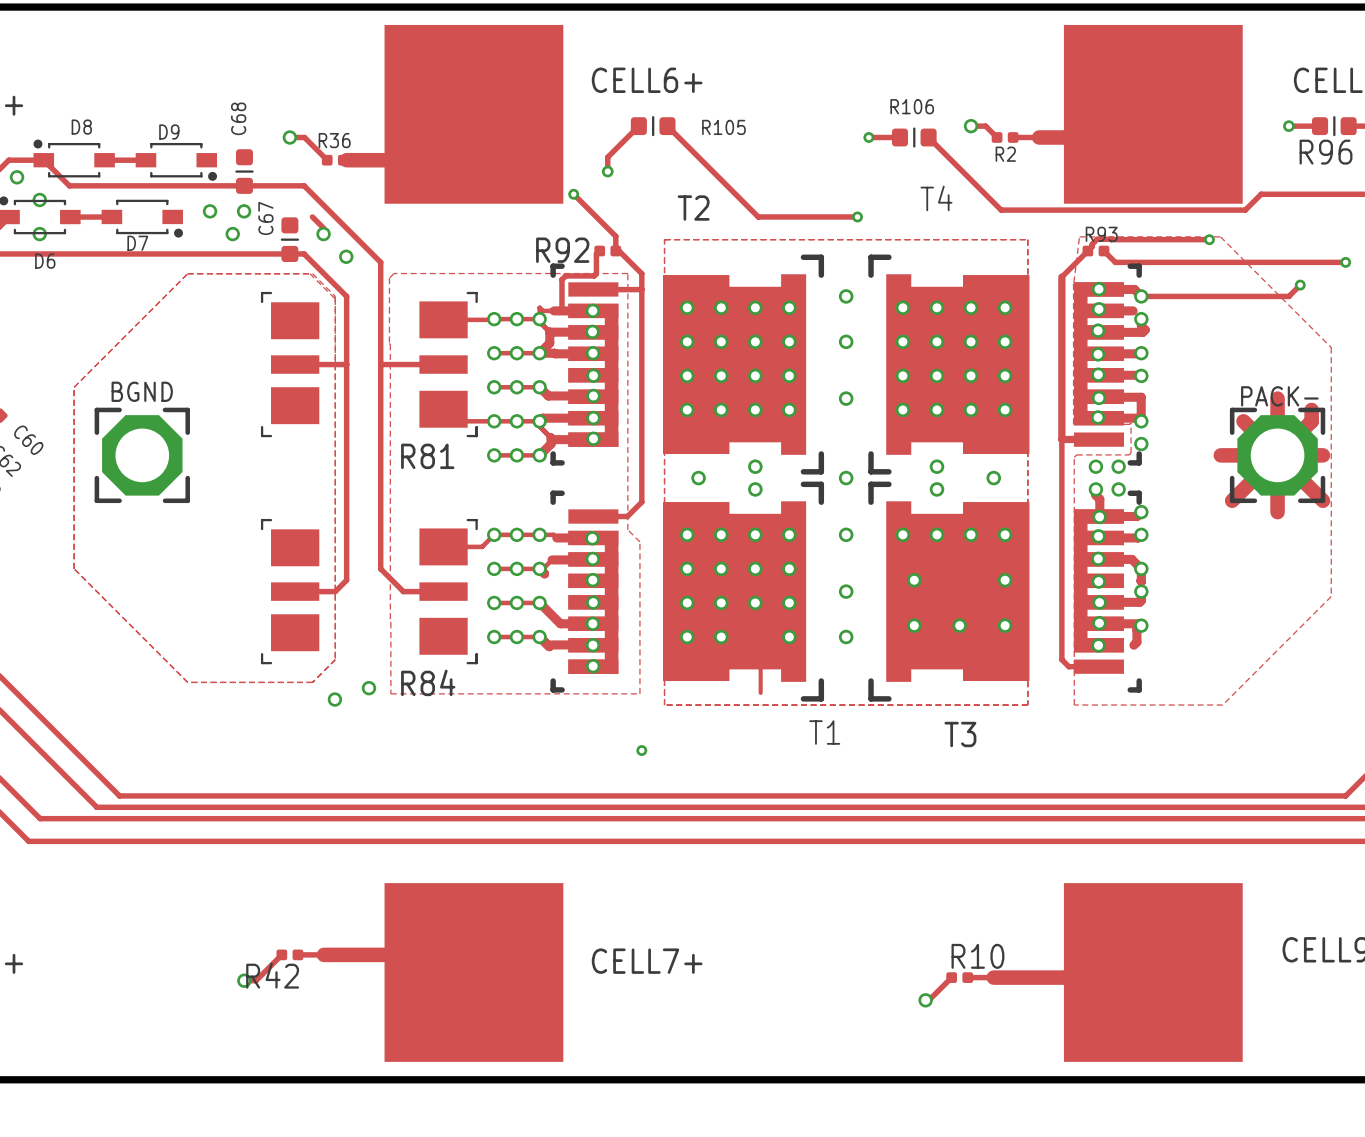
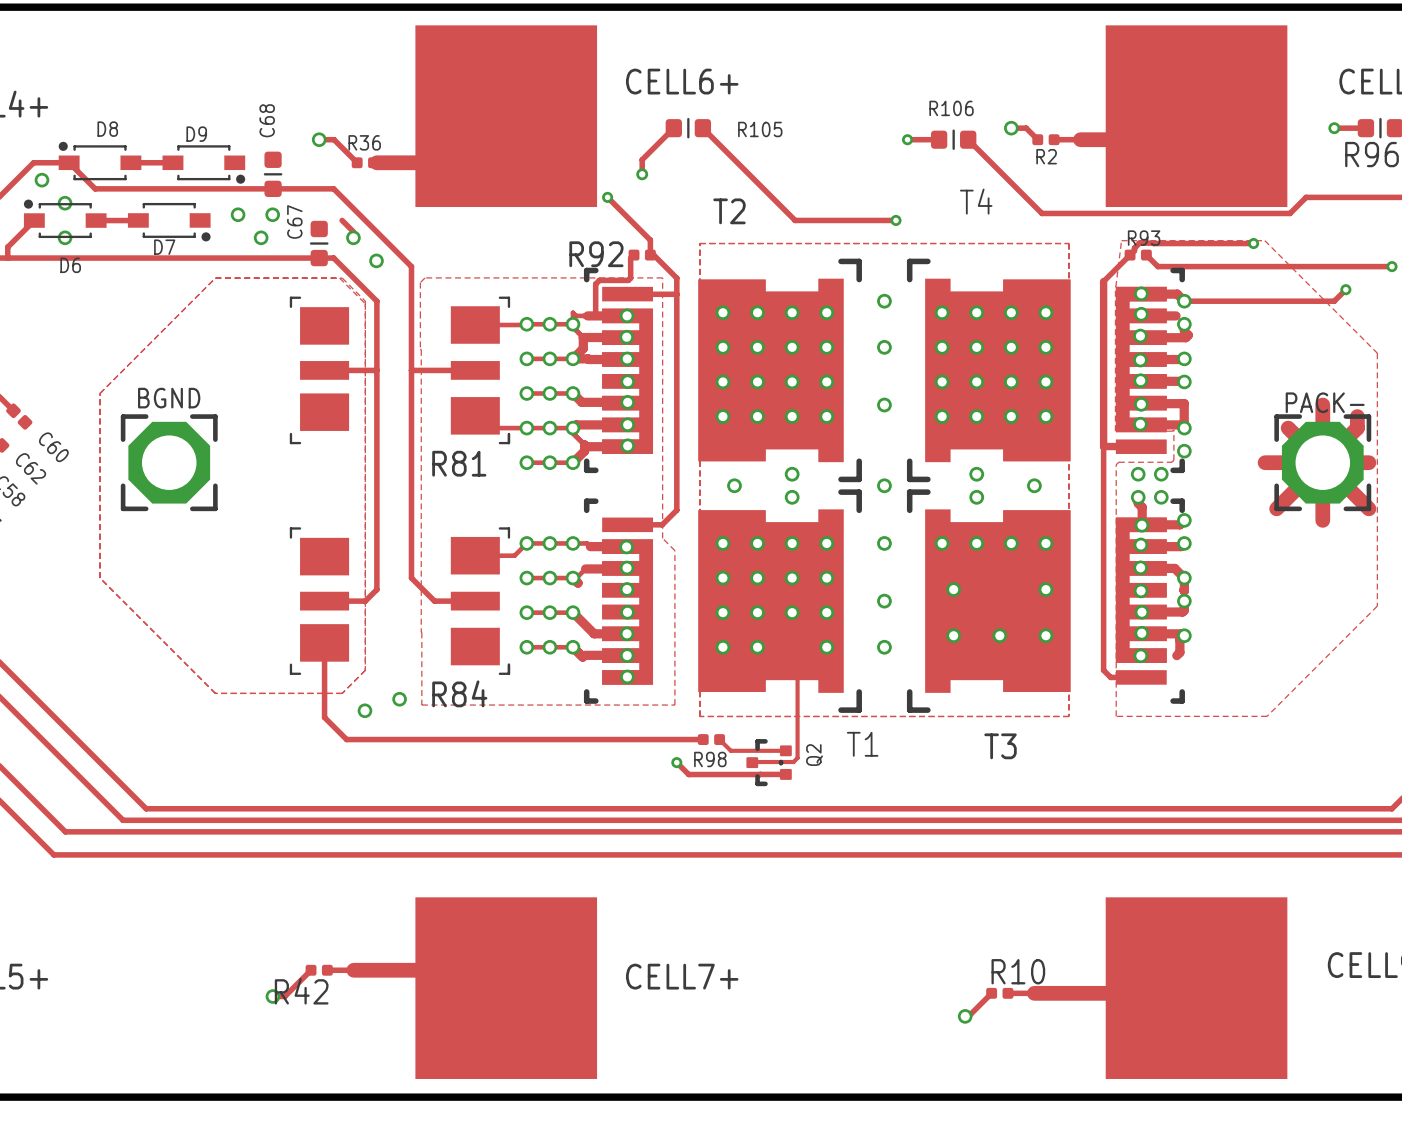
track: none -> (324, 642) (324, 717) (346, 739) (703, 739)
track: none -> (797, 704) (797, 758) (793, 762) (752, 762)
R98: none -> (711, 739)
track: none -> (719, 739) (730, 750) (785, 750)
track: none -> (676, 762) (688, 774) (760, 774)
Q2: none -> (769, 762)
track: none -> (760, 774) (785, 774)

